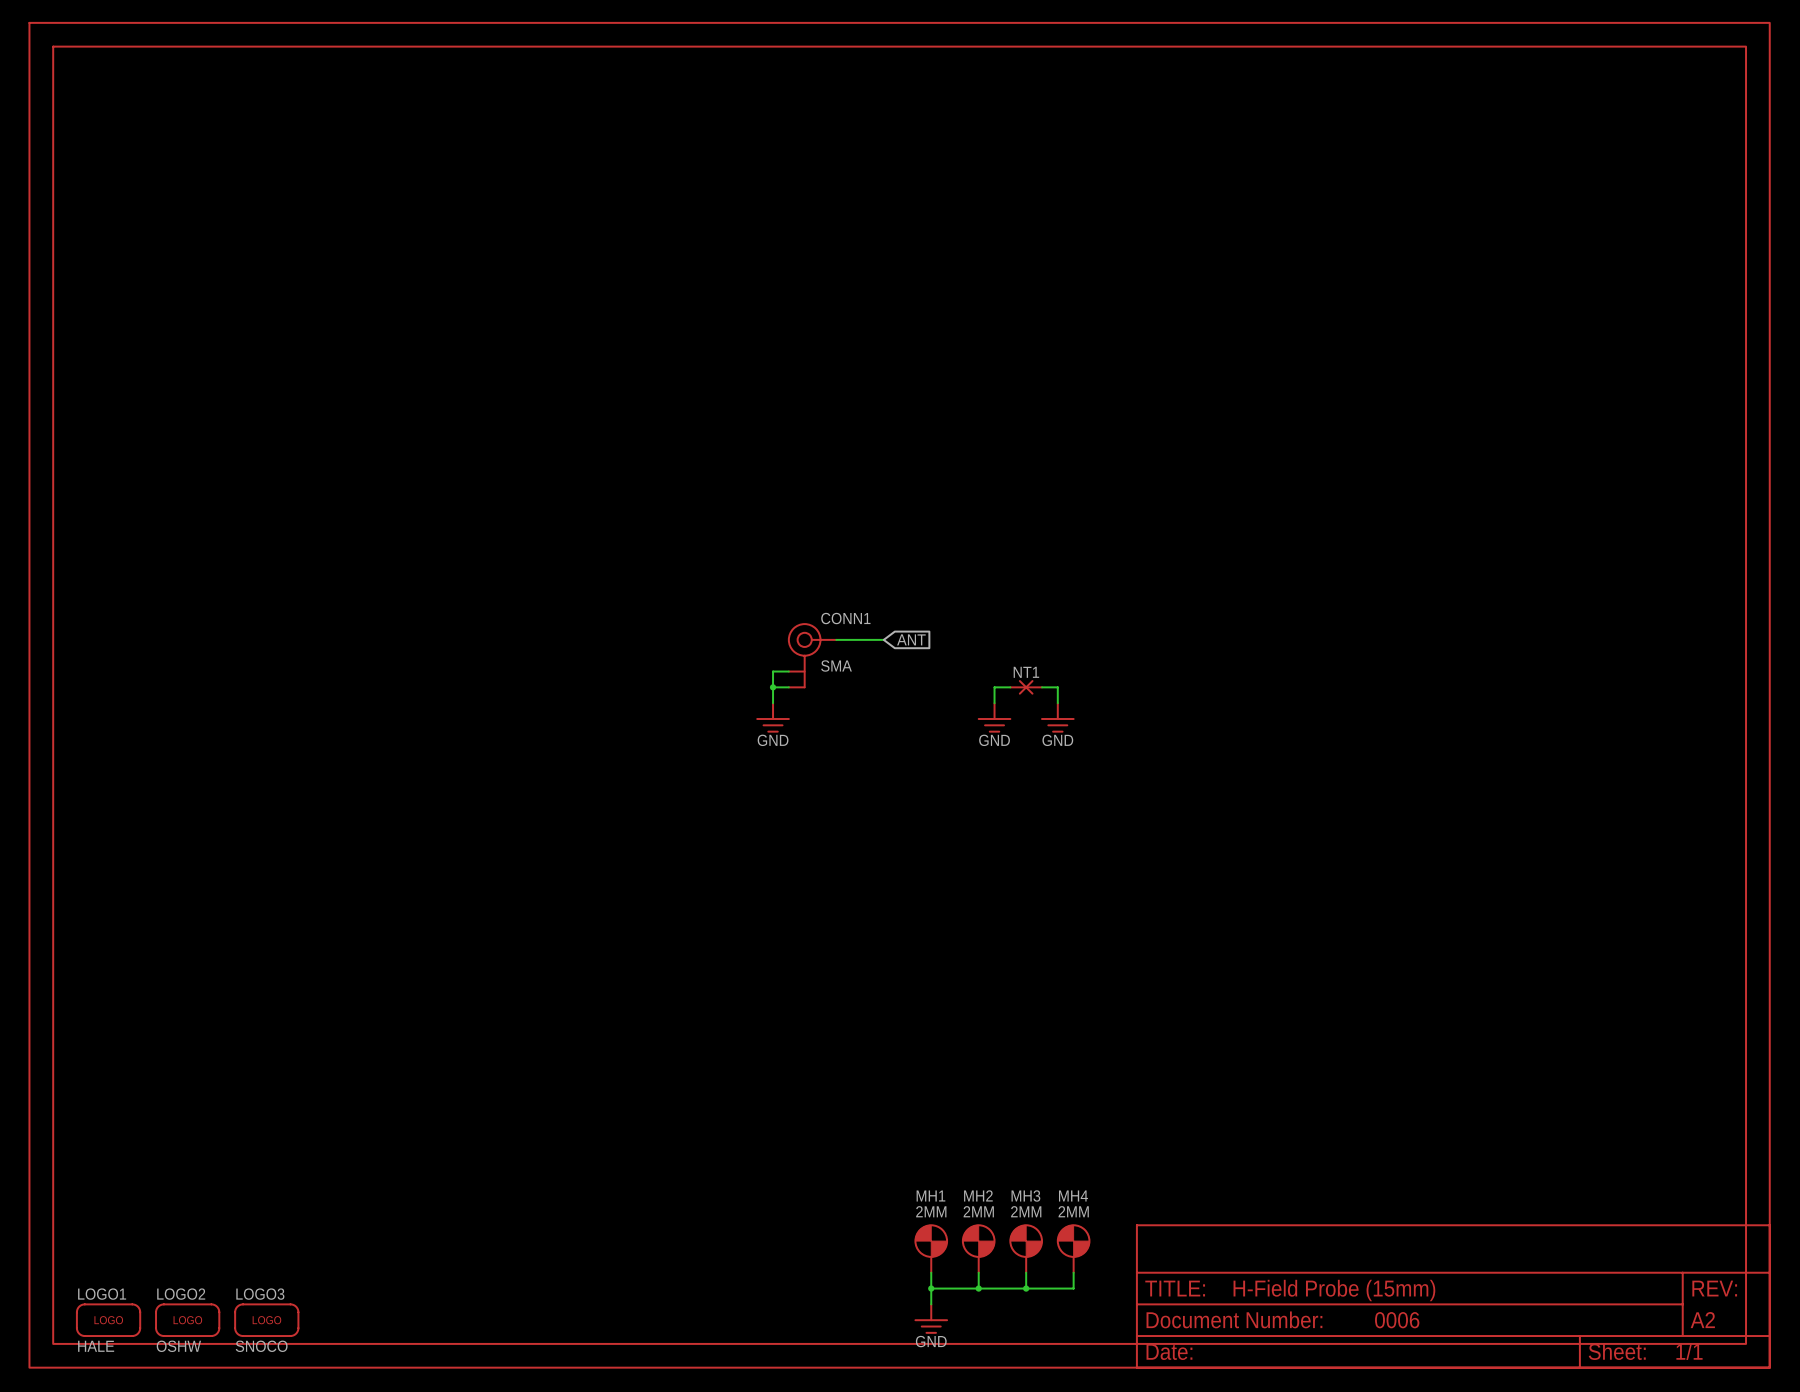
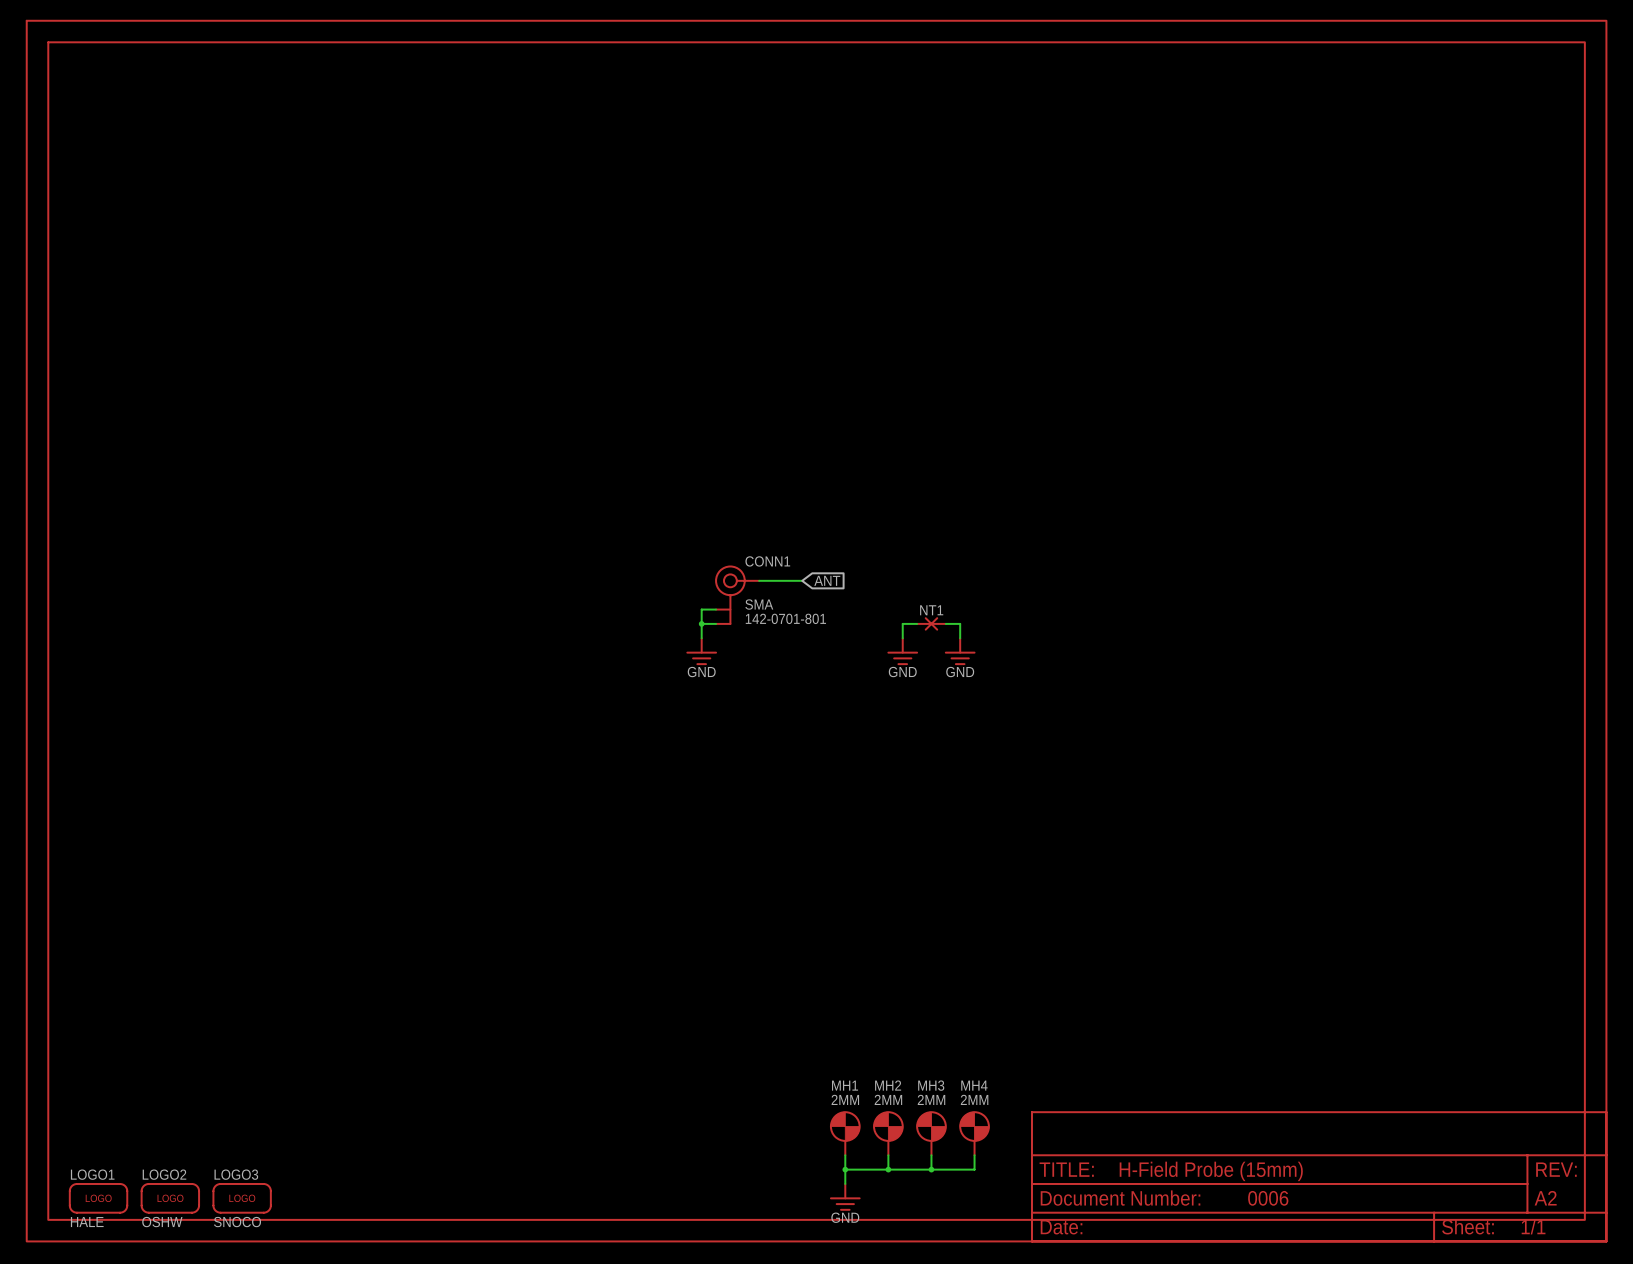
CONN1 text: none -> 142-0701-801 (785, 618)

